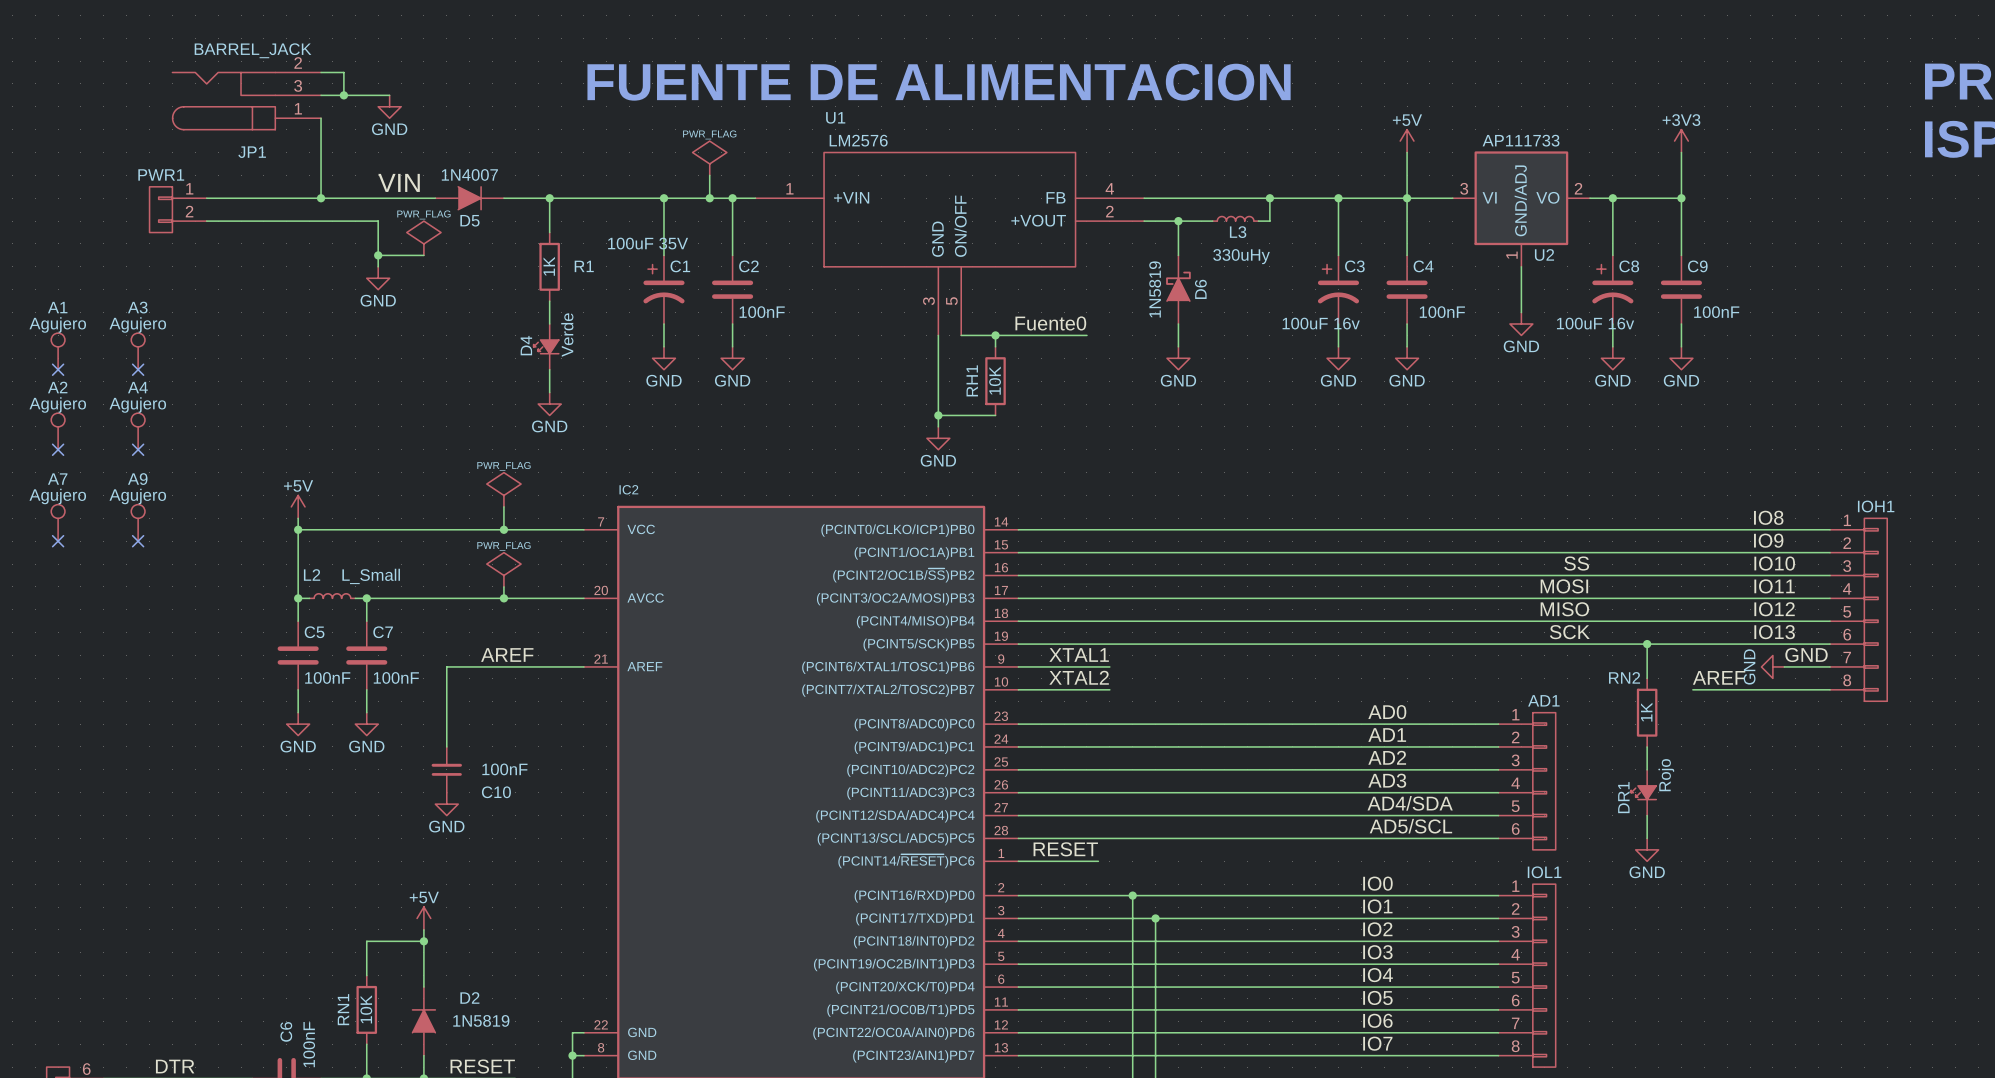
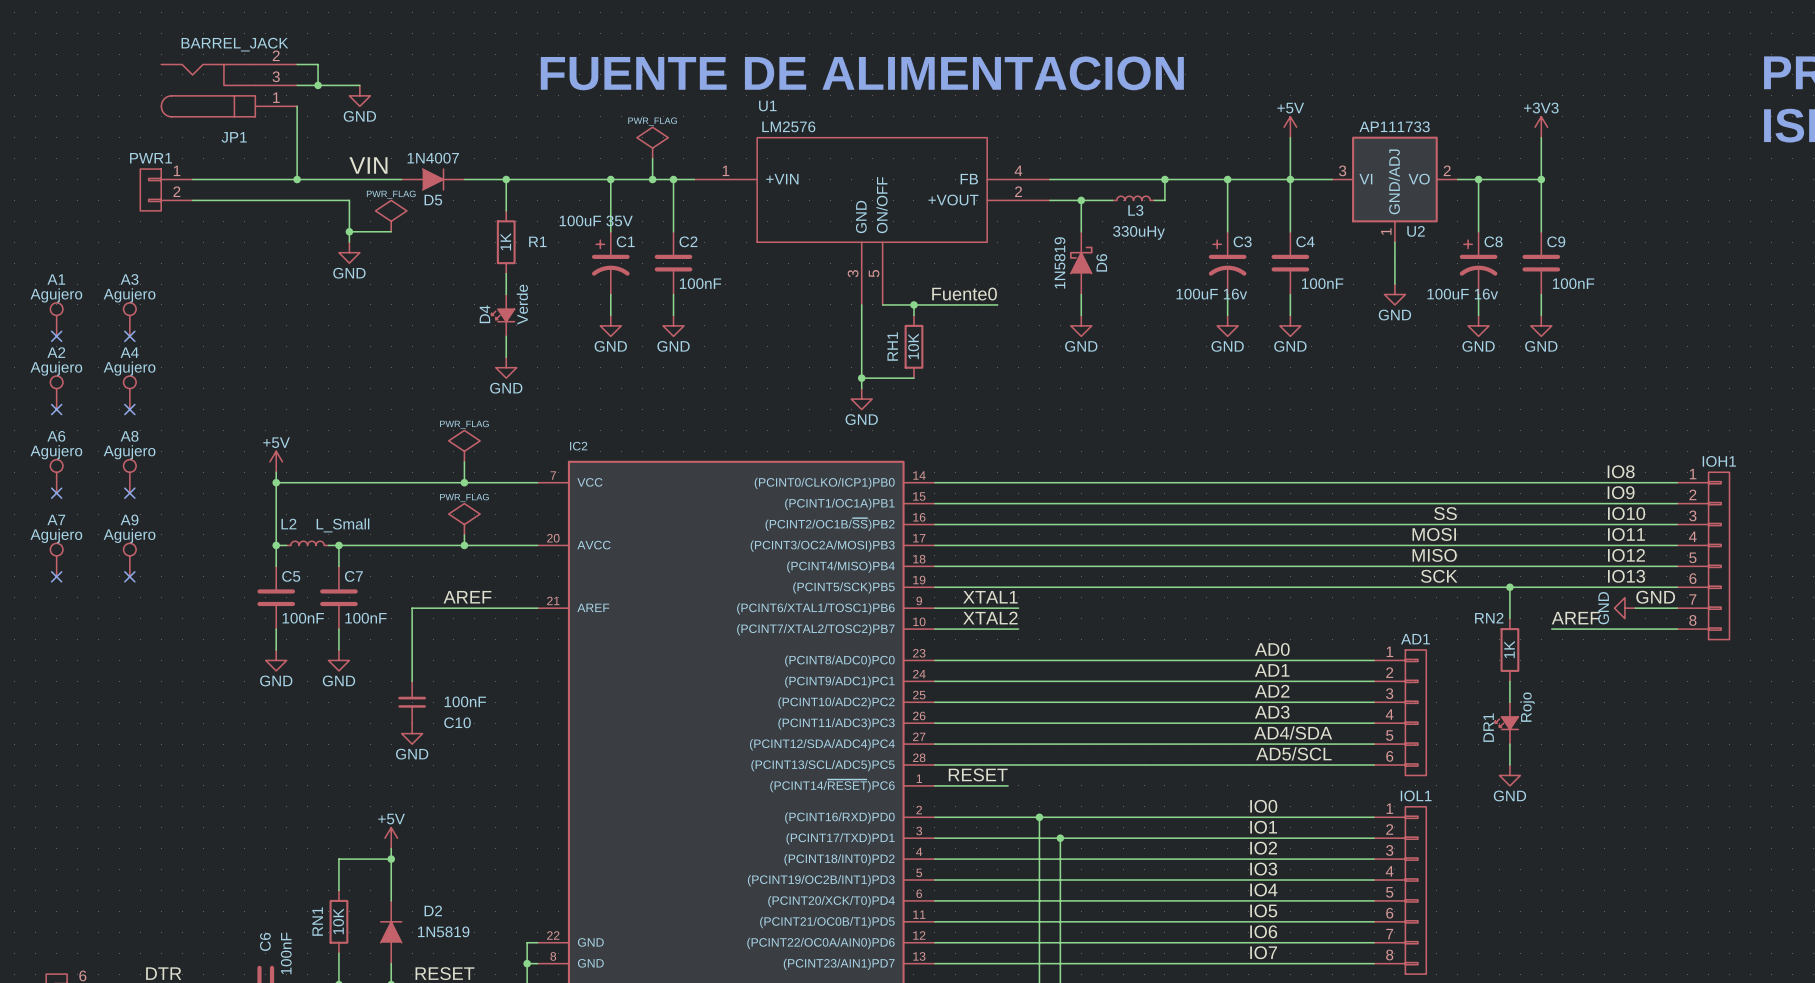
A7 name: A7 (57, 479) -> A6 (56, 436)
A9 name: A9 (137, 479) -> A8 (129, 436)
A7: none -> Agujero (56, 560)
A9: none -> Agujero (129, 560)
no-connect mark: none -> (56, 576)
no-connect mark: none -> (129, 576)

